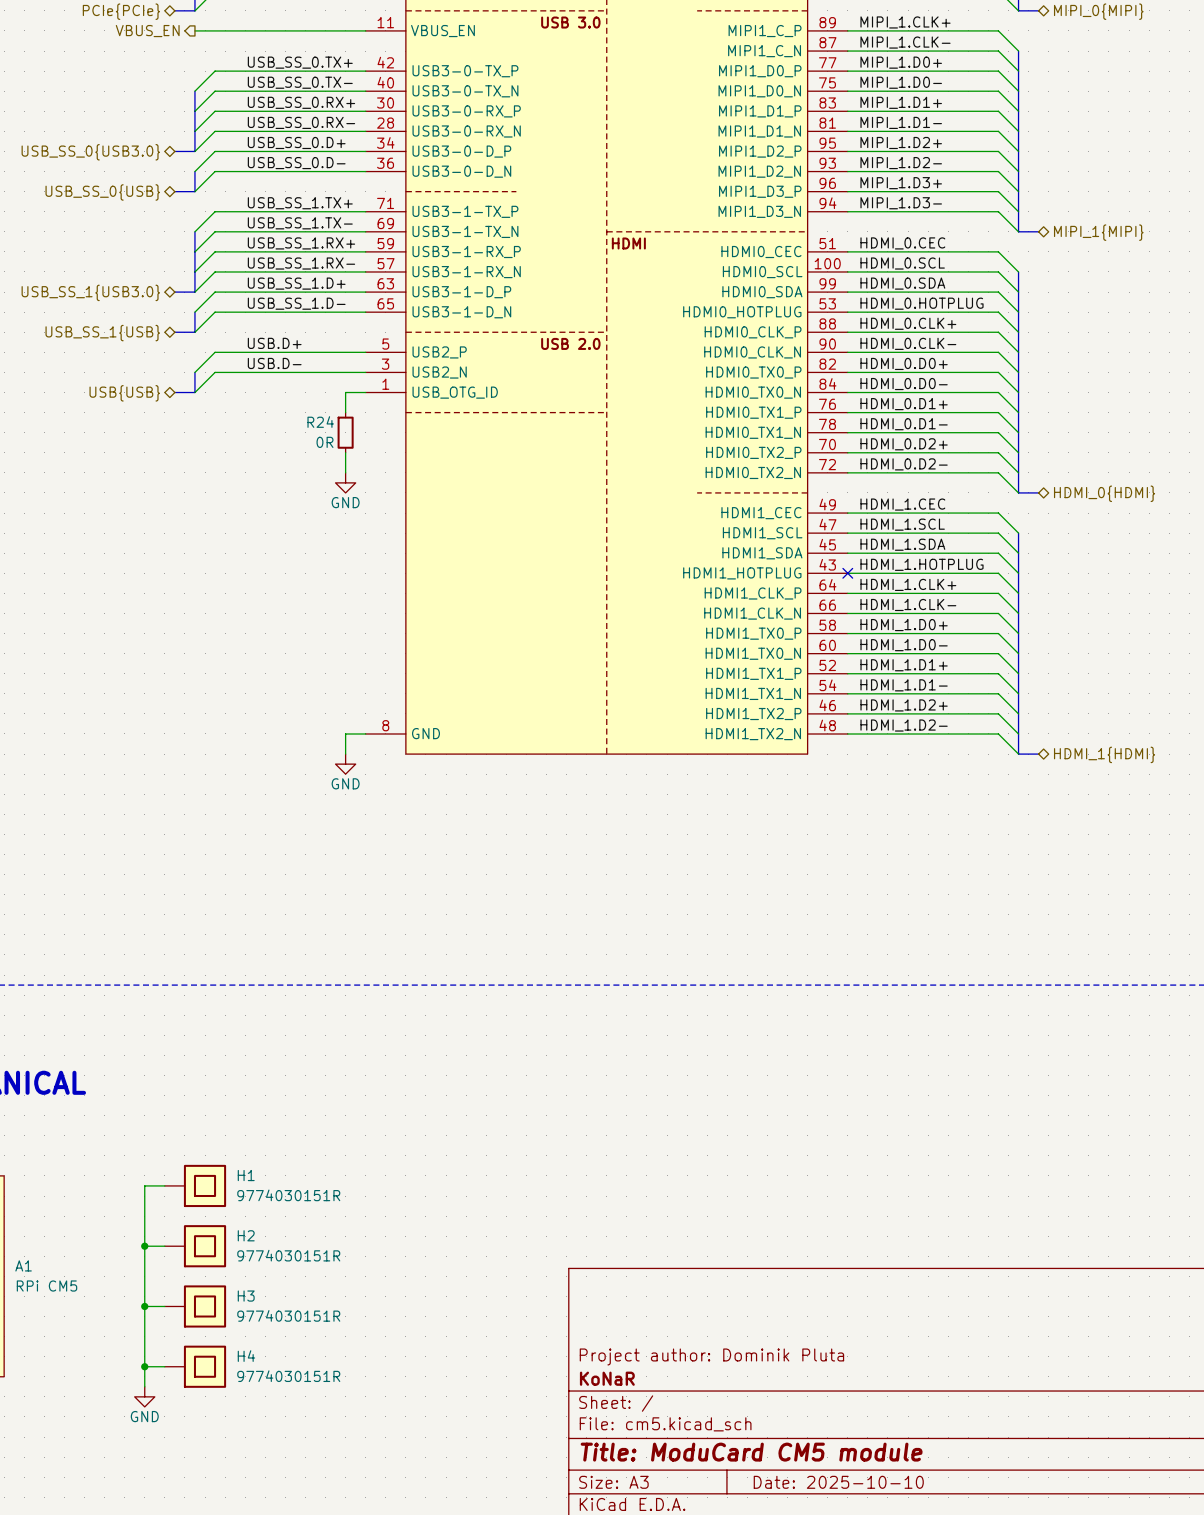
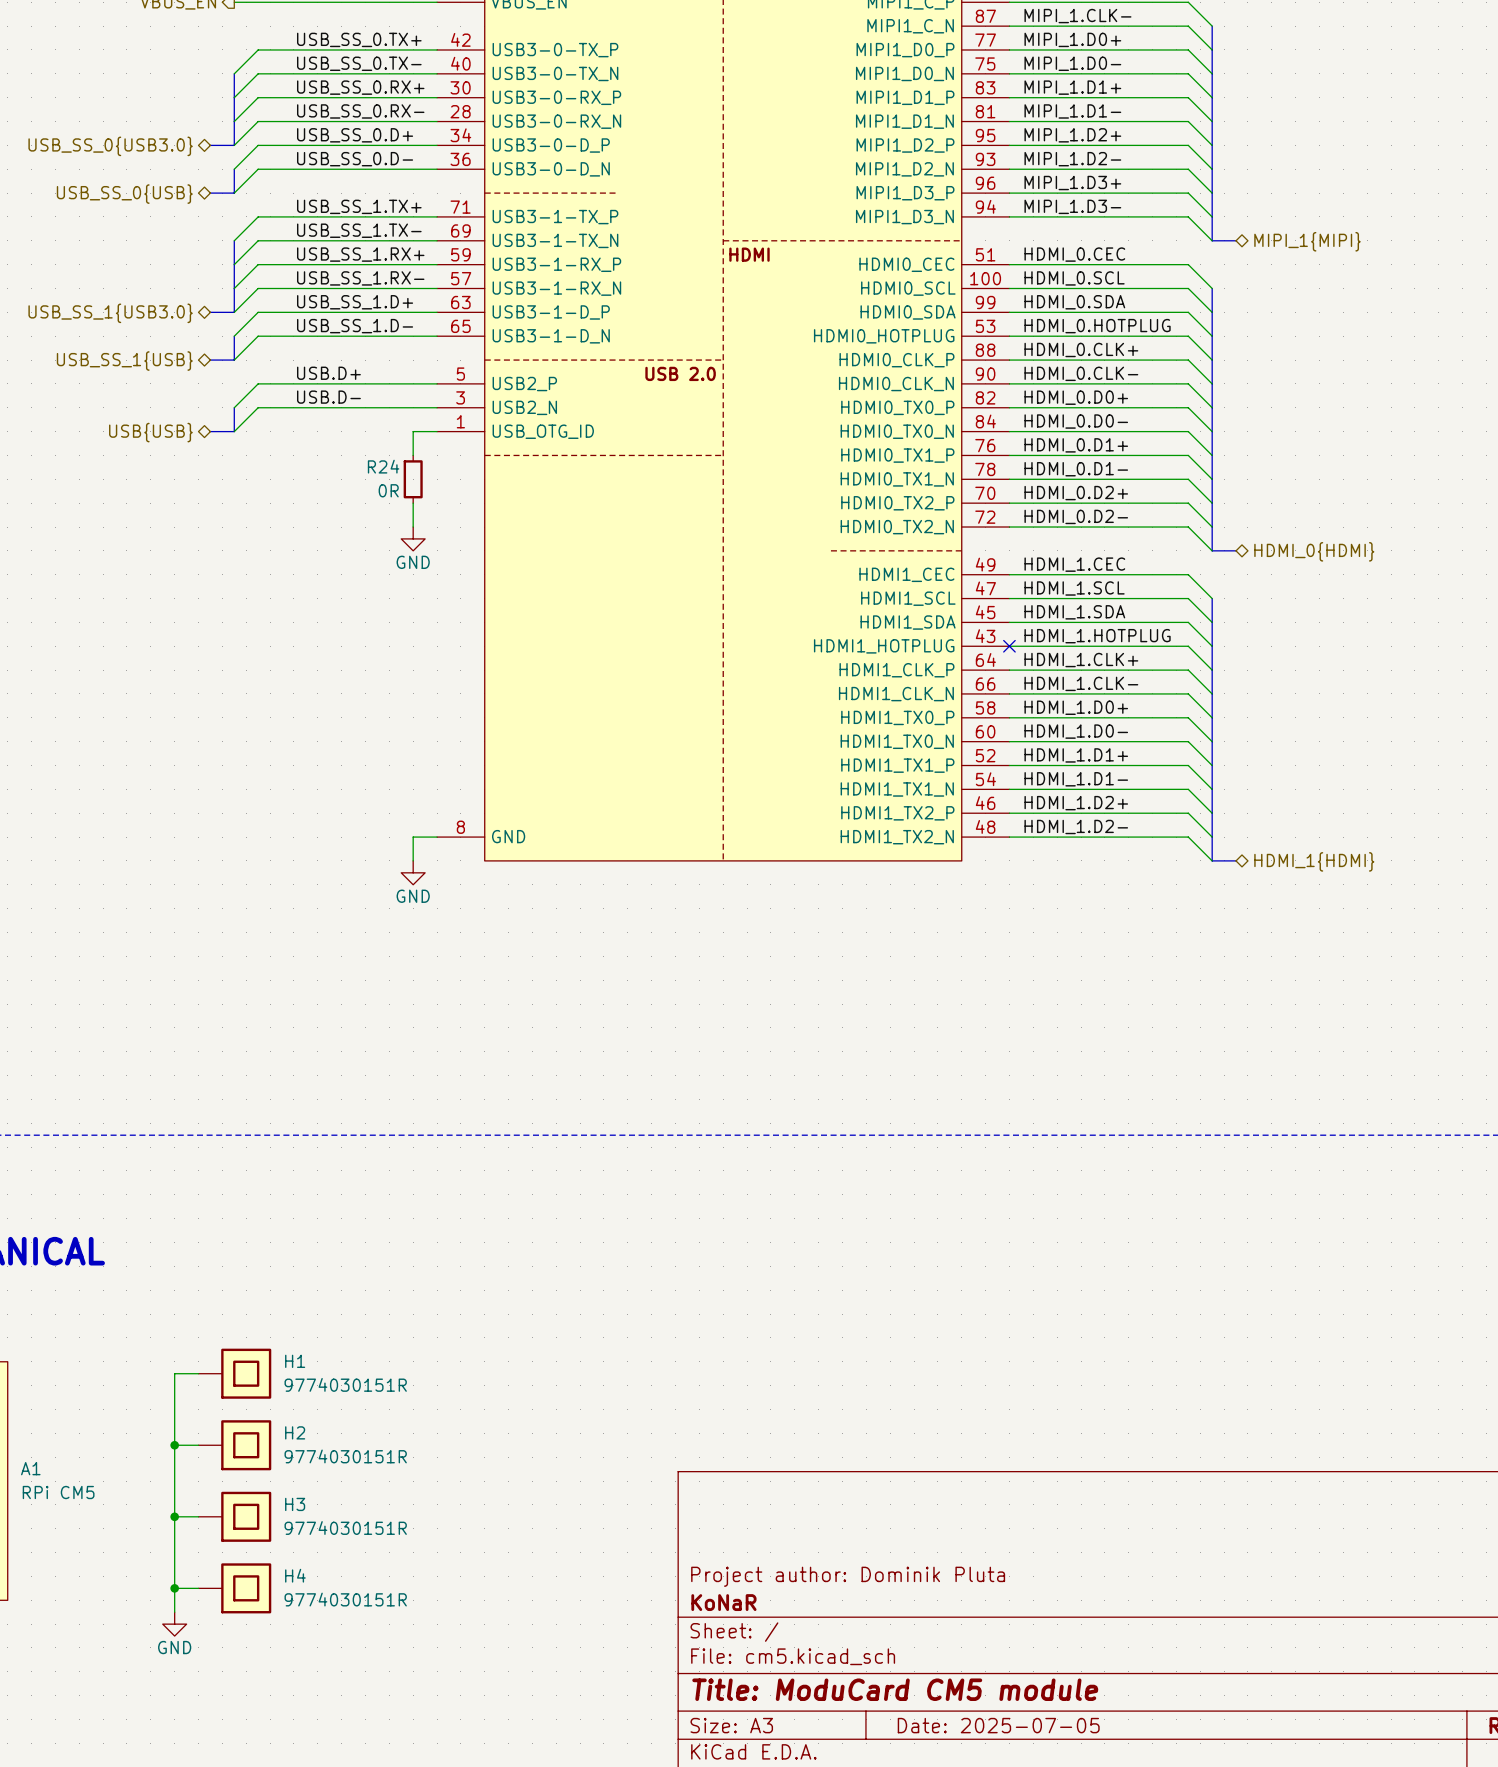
title block: Date: 2025-10-10 (838, 1482) -> Date: 2025-07-05 (998, 1725)

